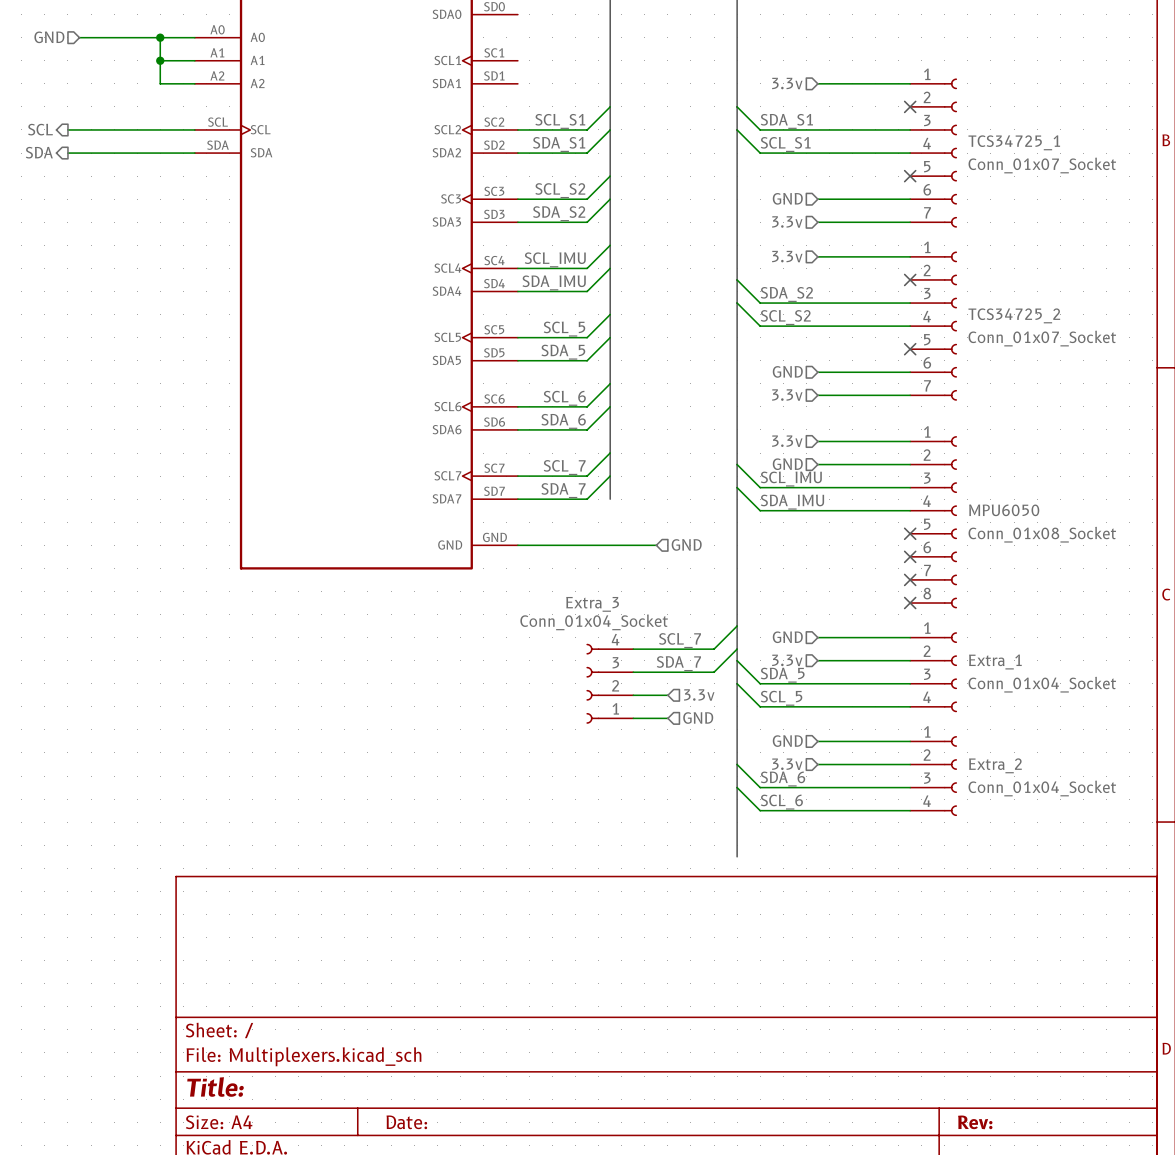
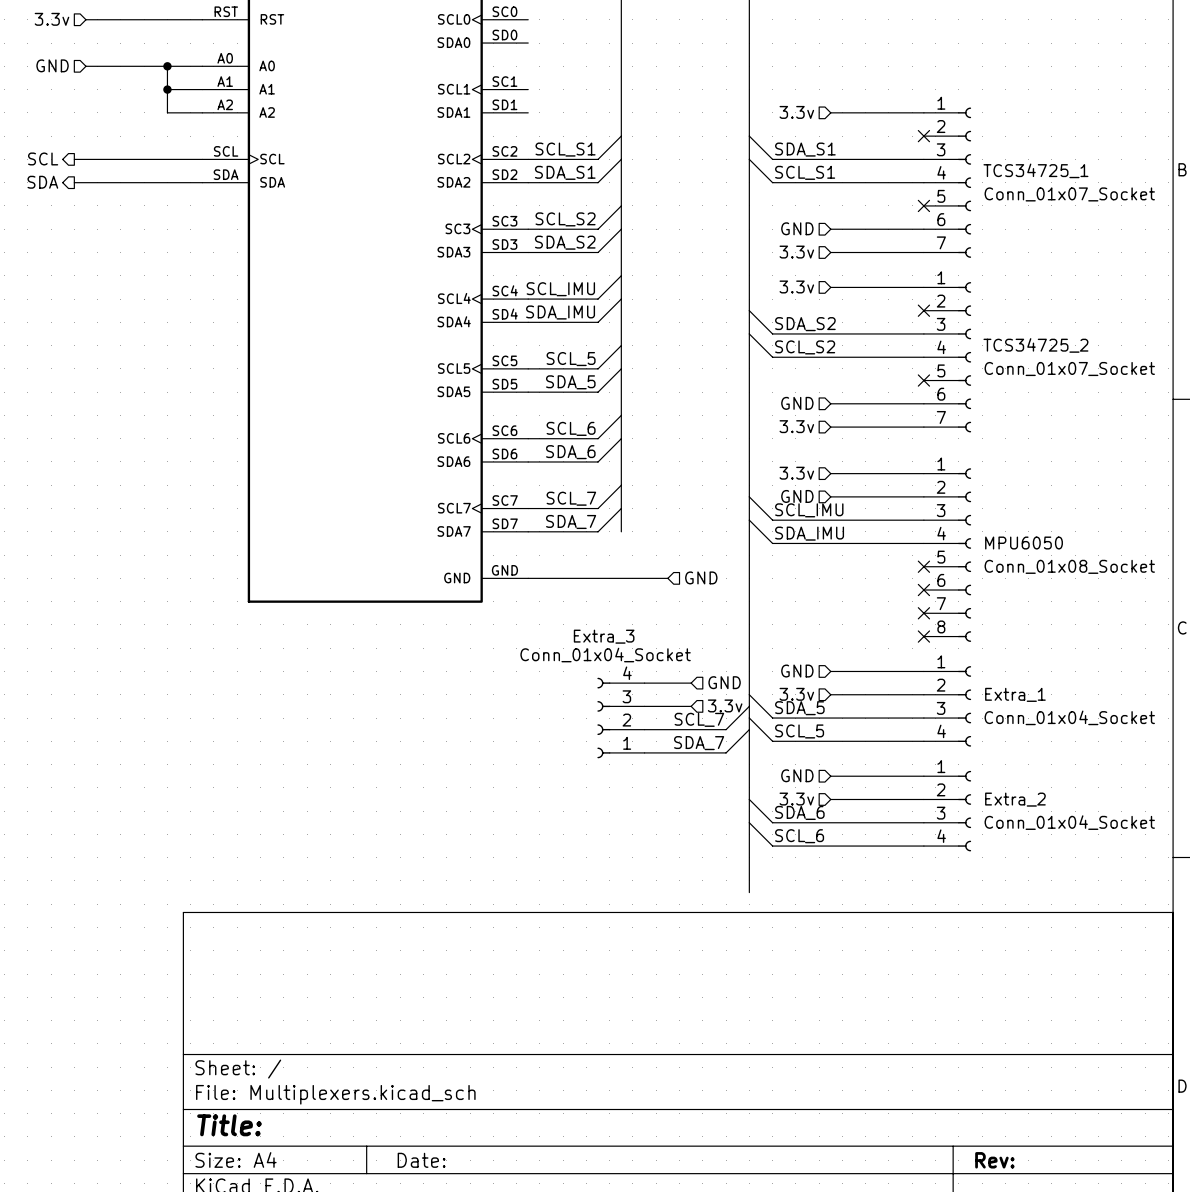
wire: (737, 626) (714, 649) (679, 649) -> none
label position: SCL_7 (680, 640) -> SCL_7 (699, 719)
wire: (737, 649) (714, 672) (679, 672) -> none
label position: SDA_7 (678, 663) -> SDA_7 (699, 743)
wire: none -> (749, 706) (726, 729) (679, 729)
hierarchical label position: 3.3v (699, 695) -> 3.3v (725, 705)
wire: none -> (749, 729) (726, 752) (679, 752)
hierarchical label position: GND (698, 718) -> GND (724, 682)

